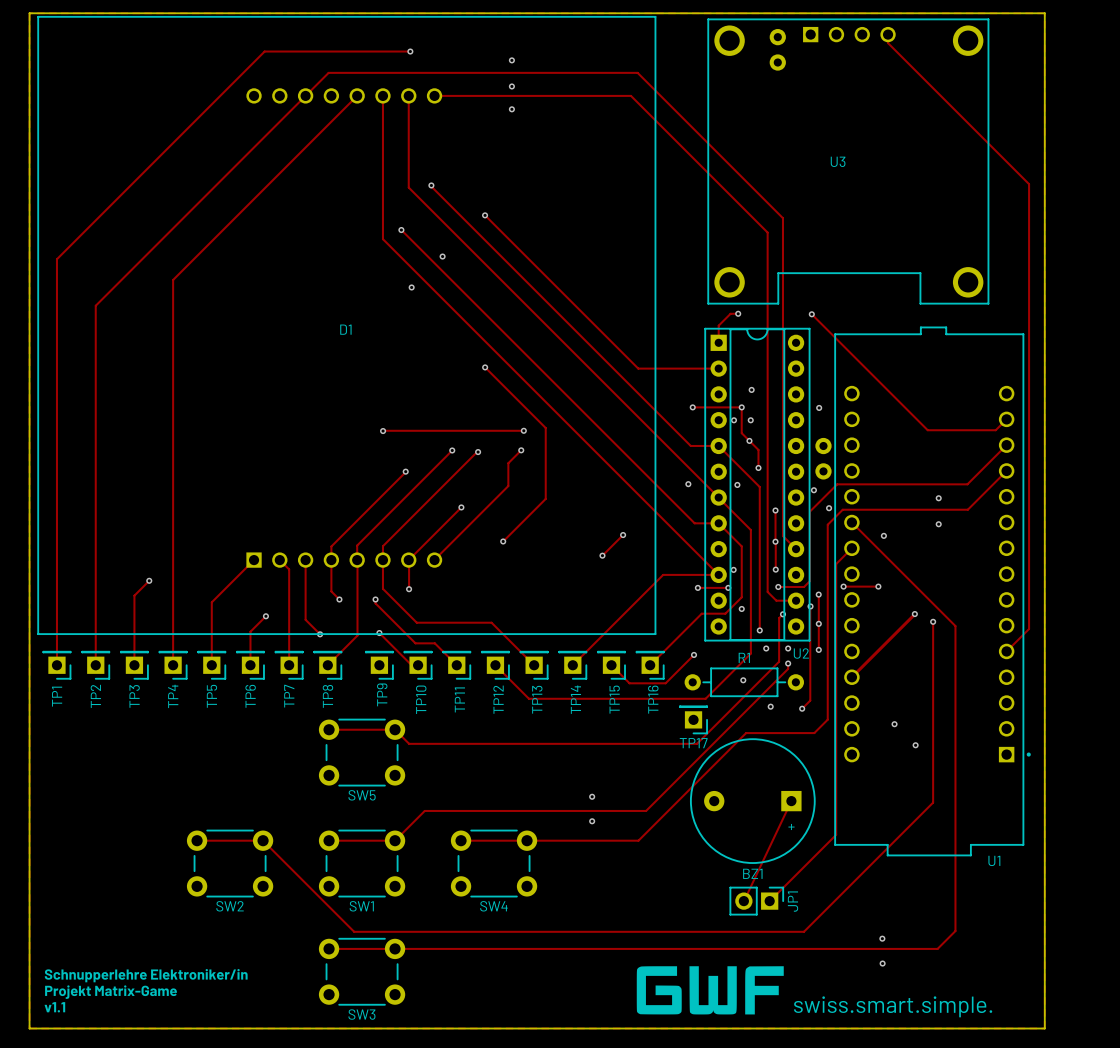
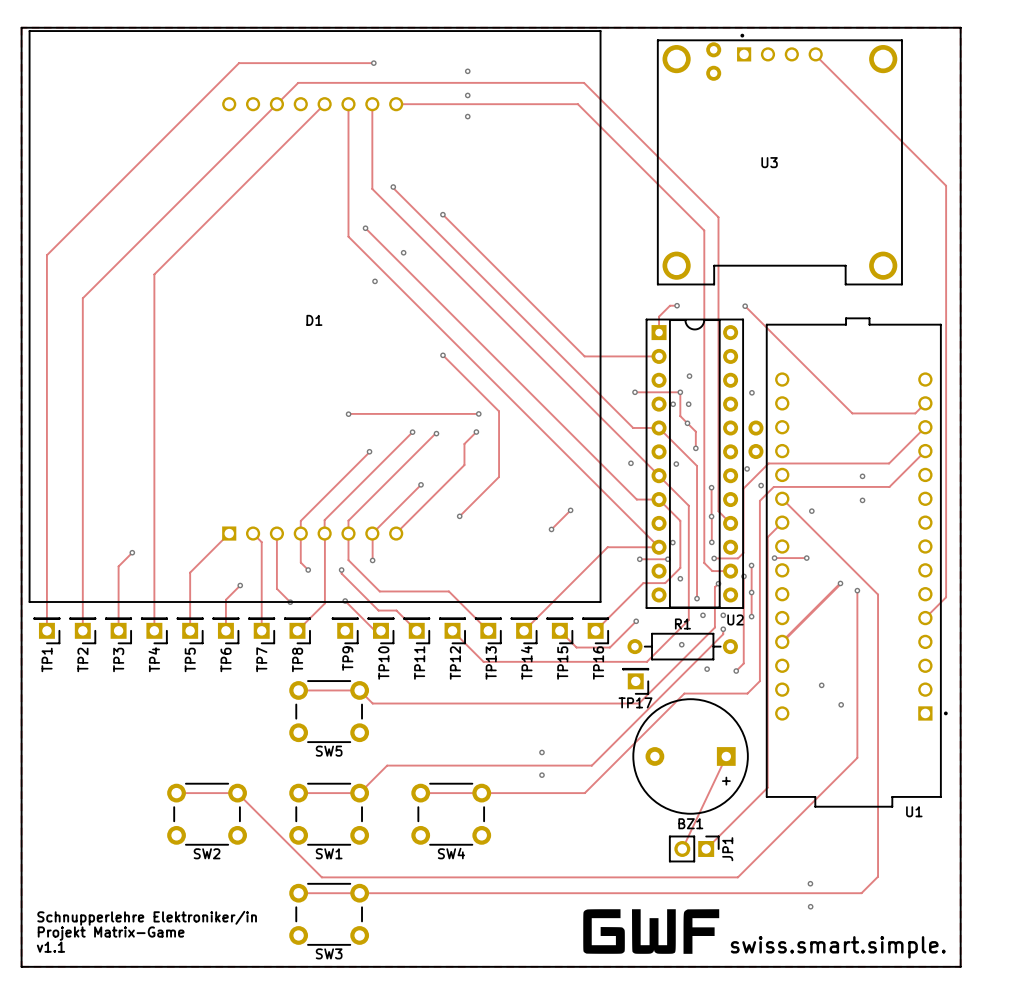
U3 footprint: [707, 18, 990, 305] -> [657, 33, 903, 286]

